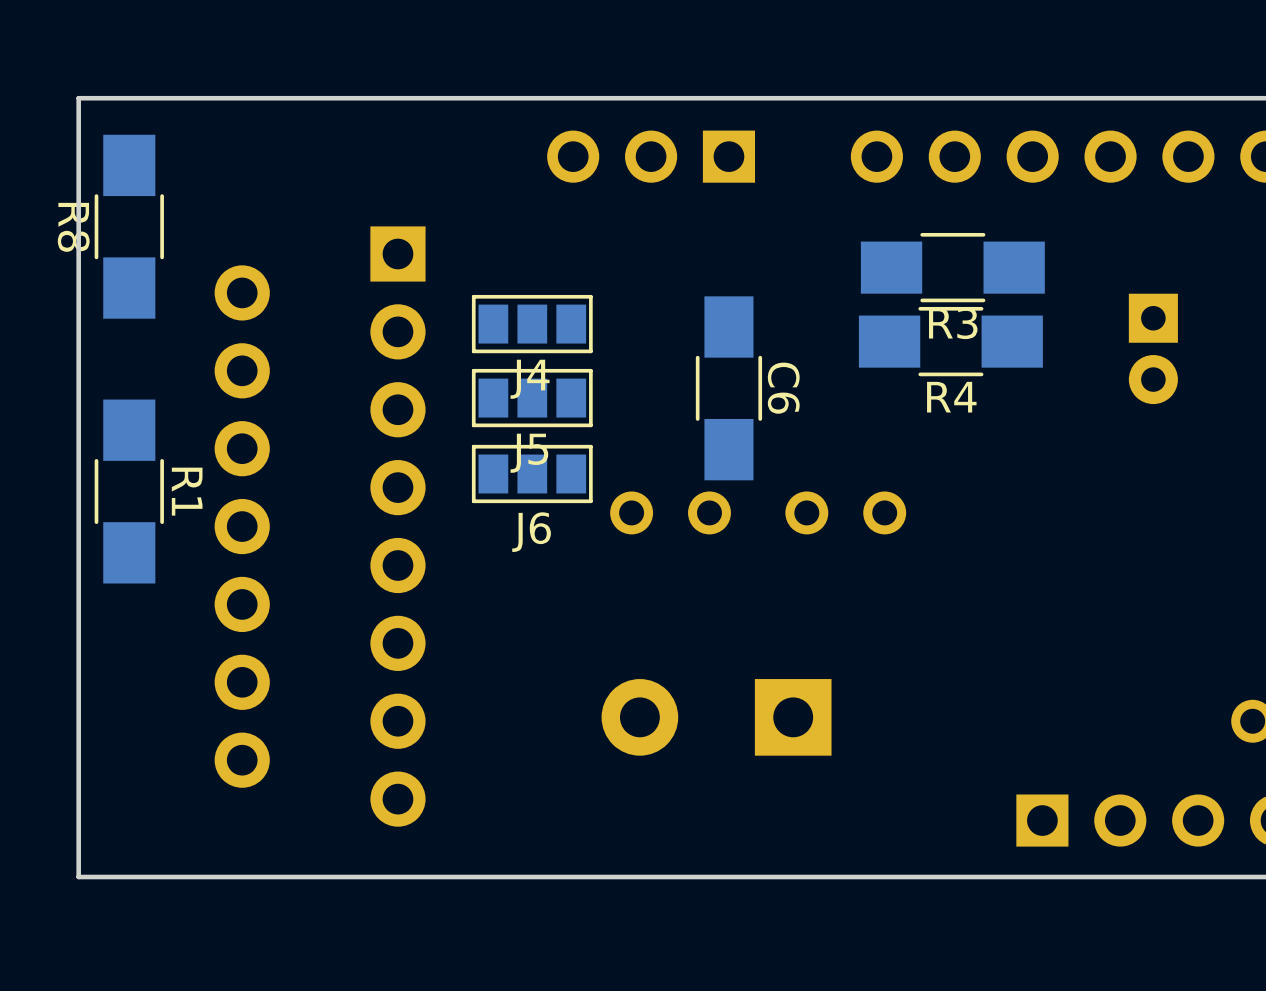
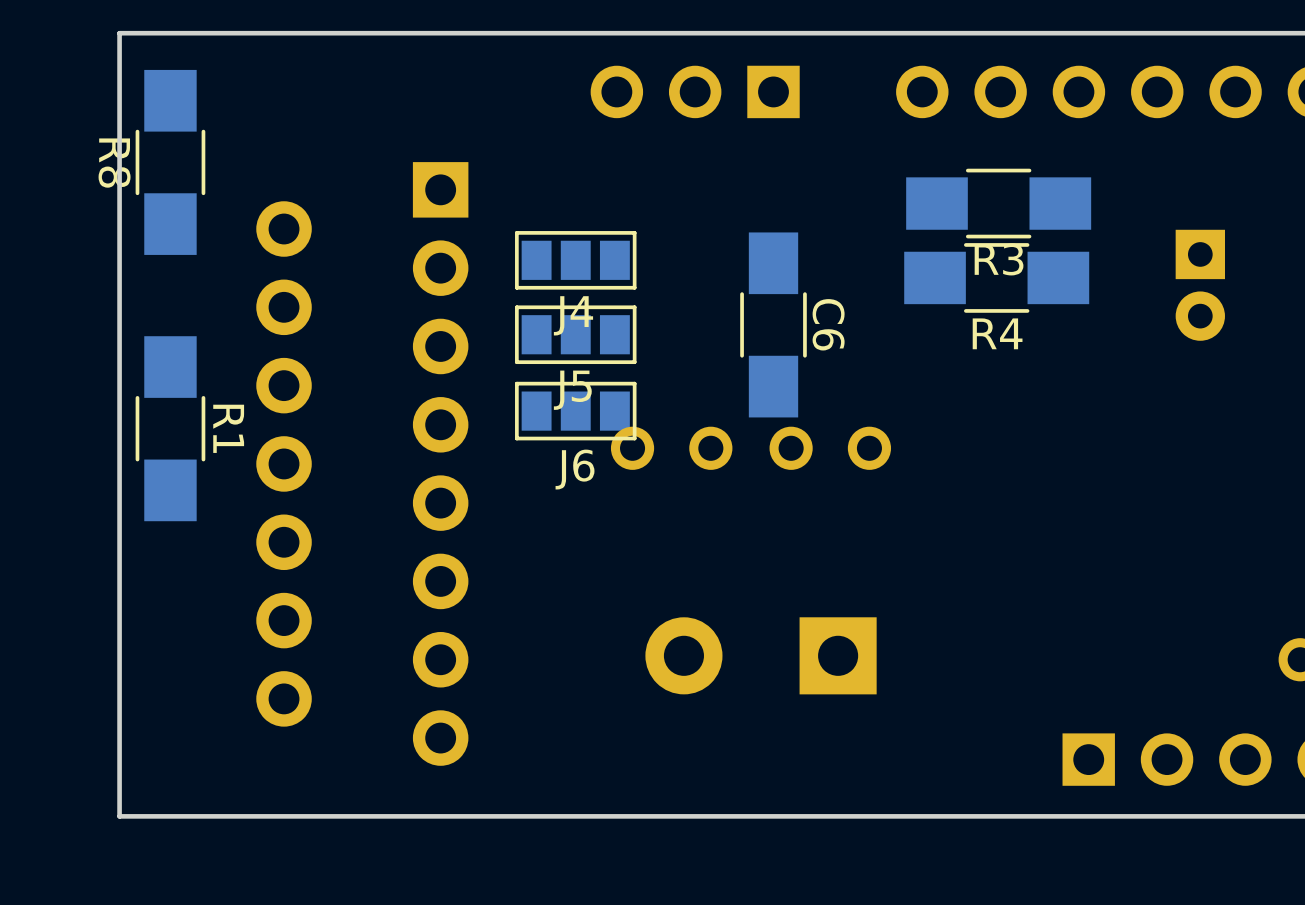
part: none -> (830, 448)
part position: (670, 512) -> (671, 448)
part: (845, 512) -> none

